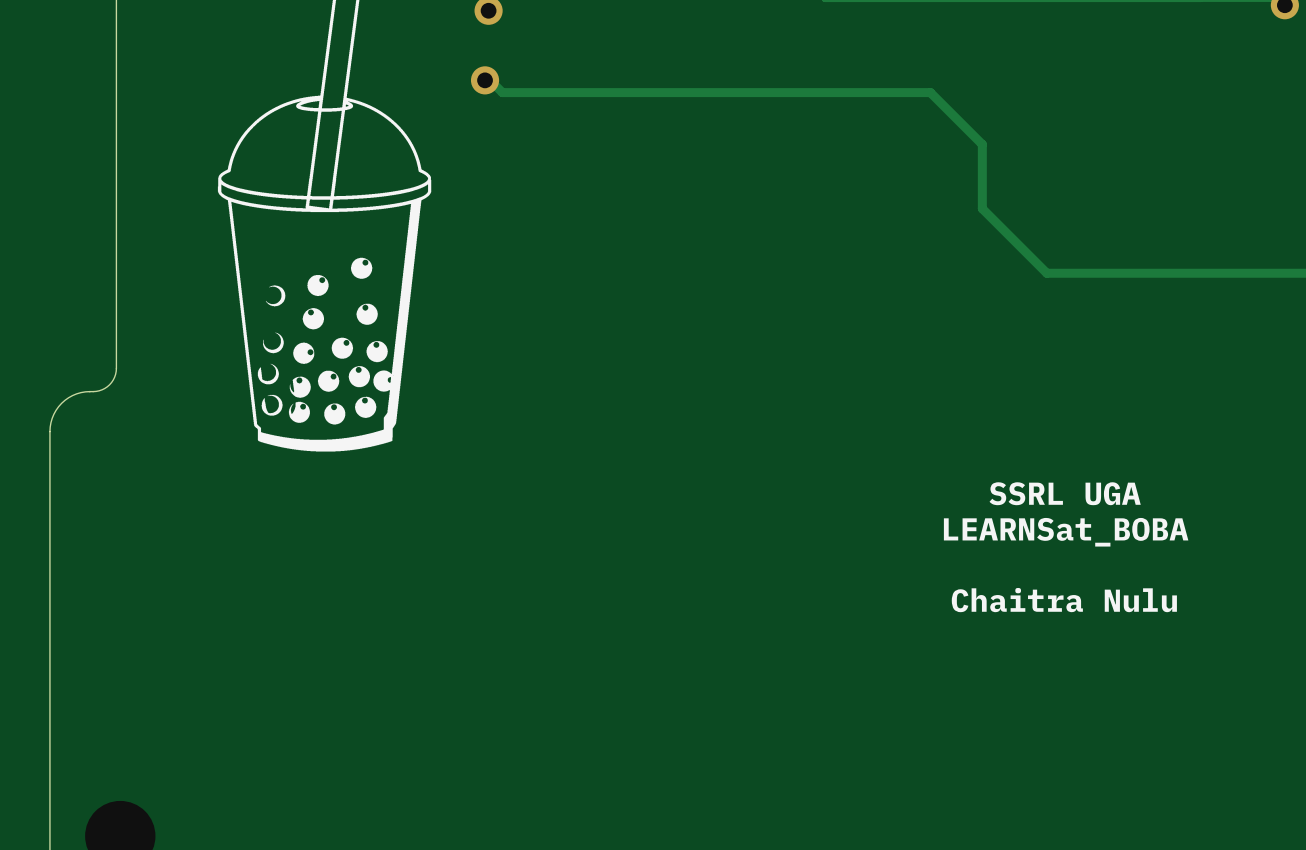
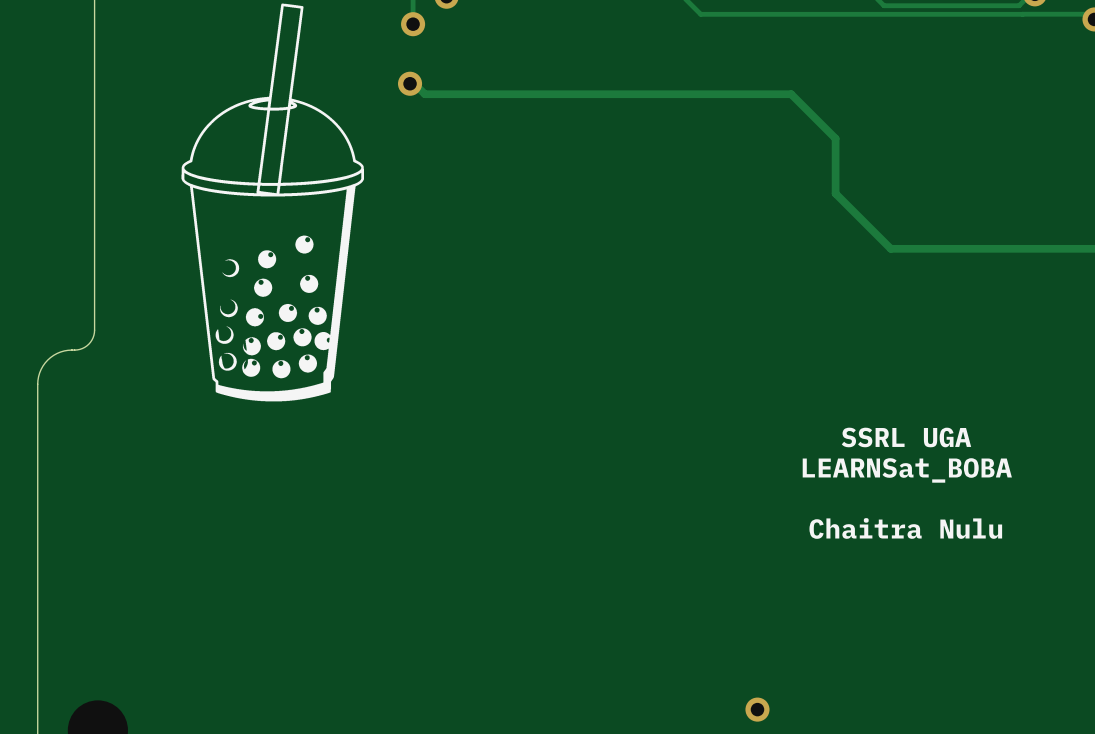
via: none -> (757, 709)

